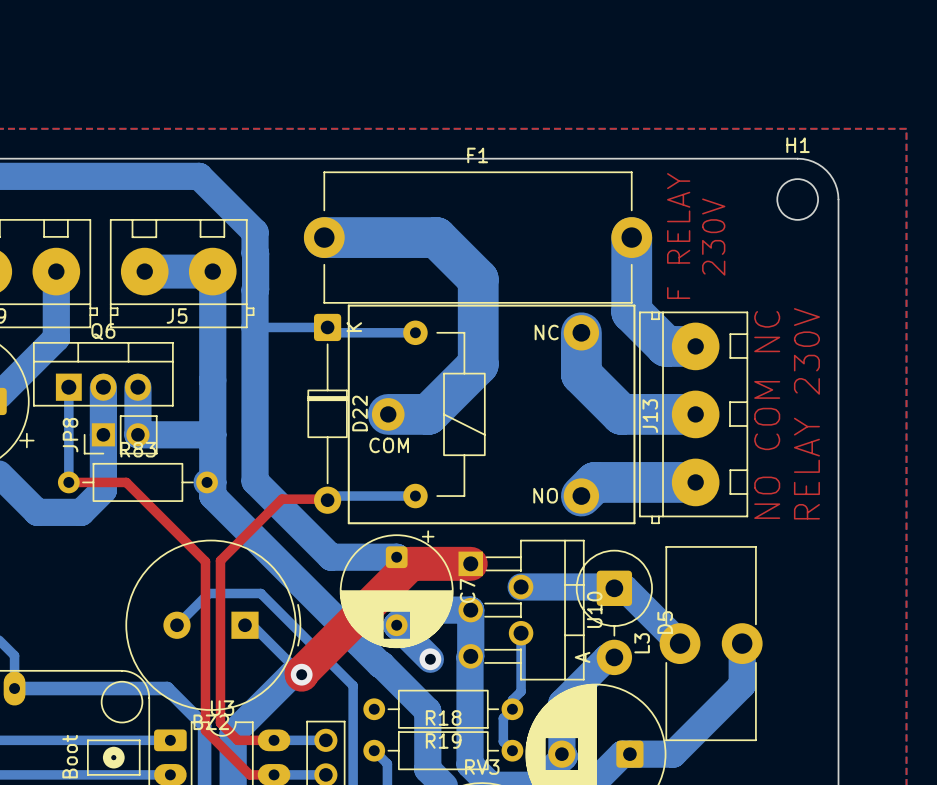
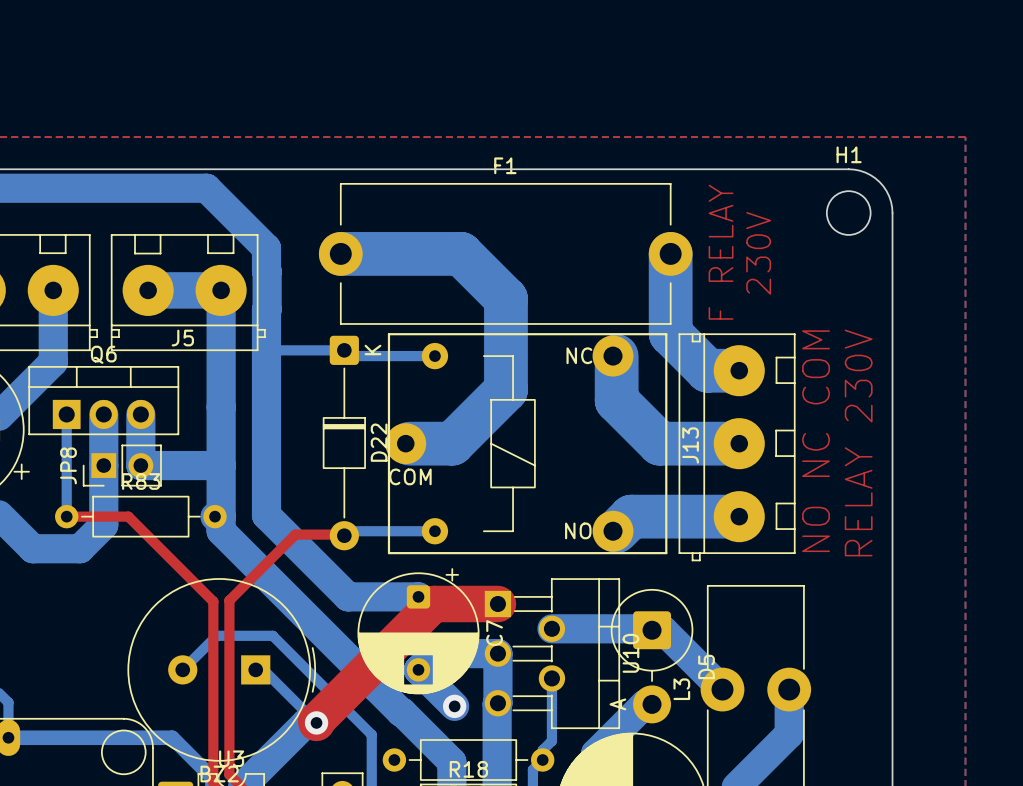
part footprint: [347, 304, 636, 525] -> [385, 333, 668, 555]
text: NO COM NC (767, 414) -> NO NC COM (816, 441)

